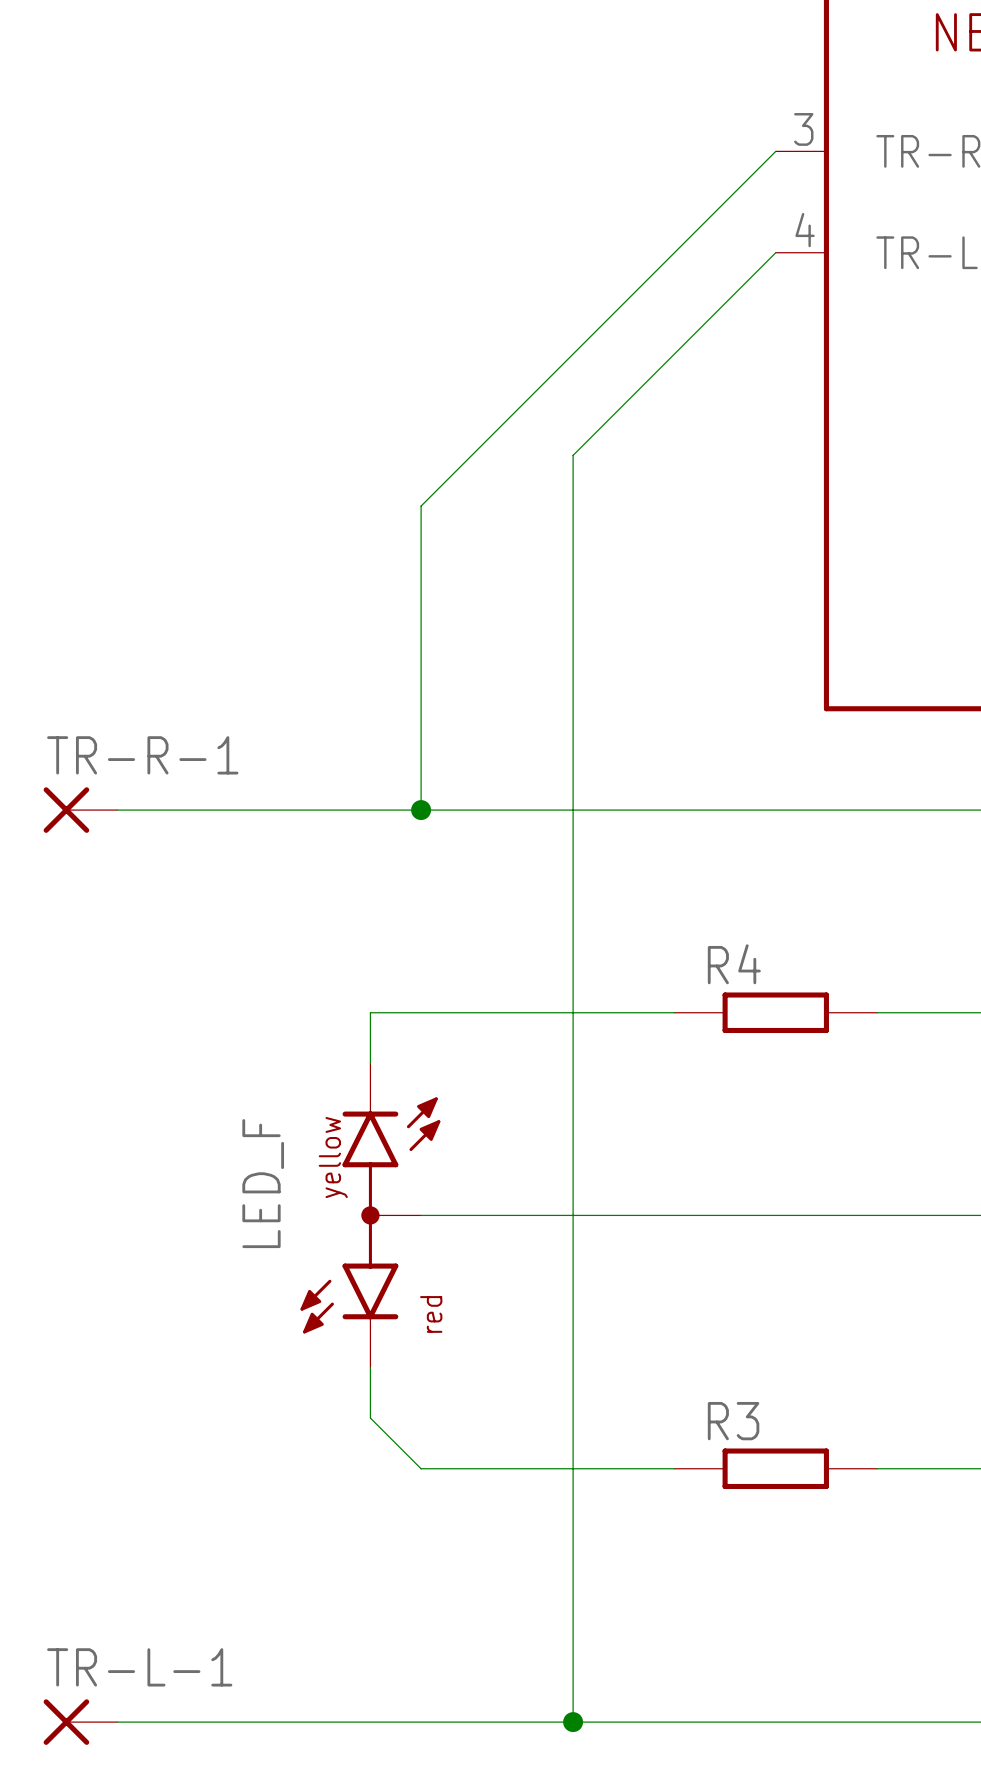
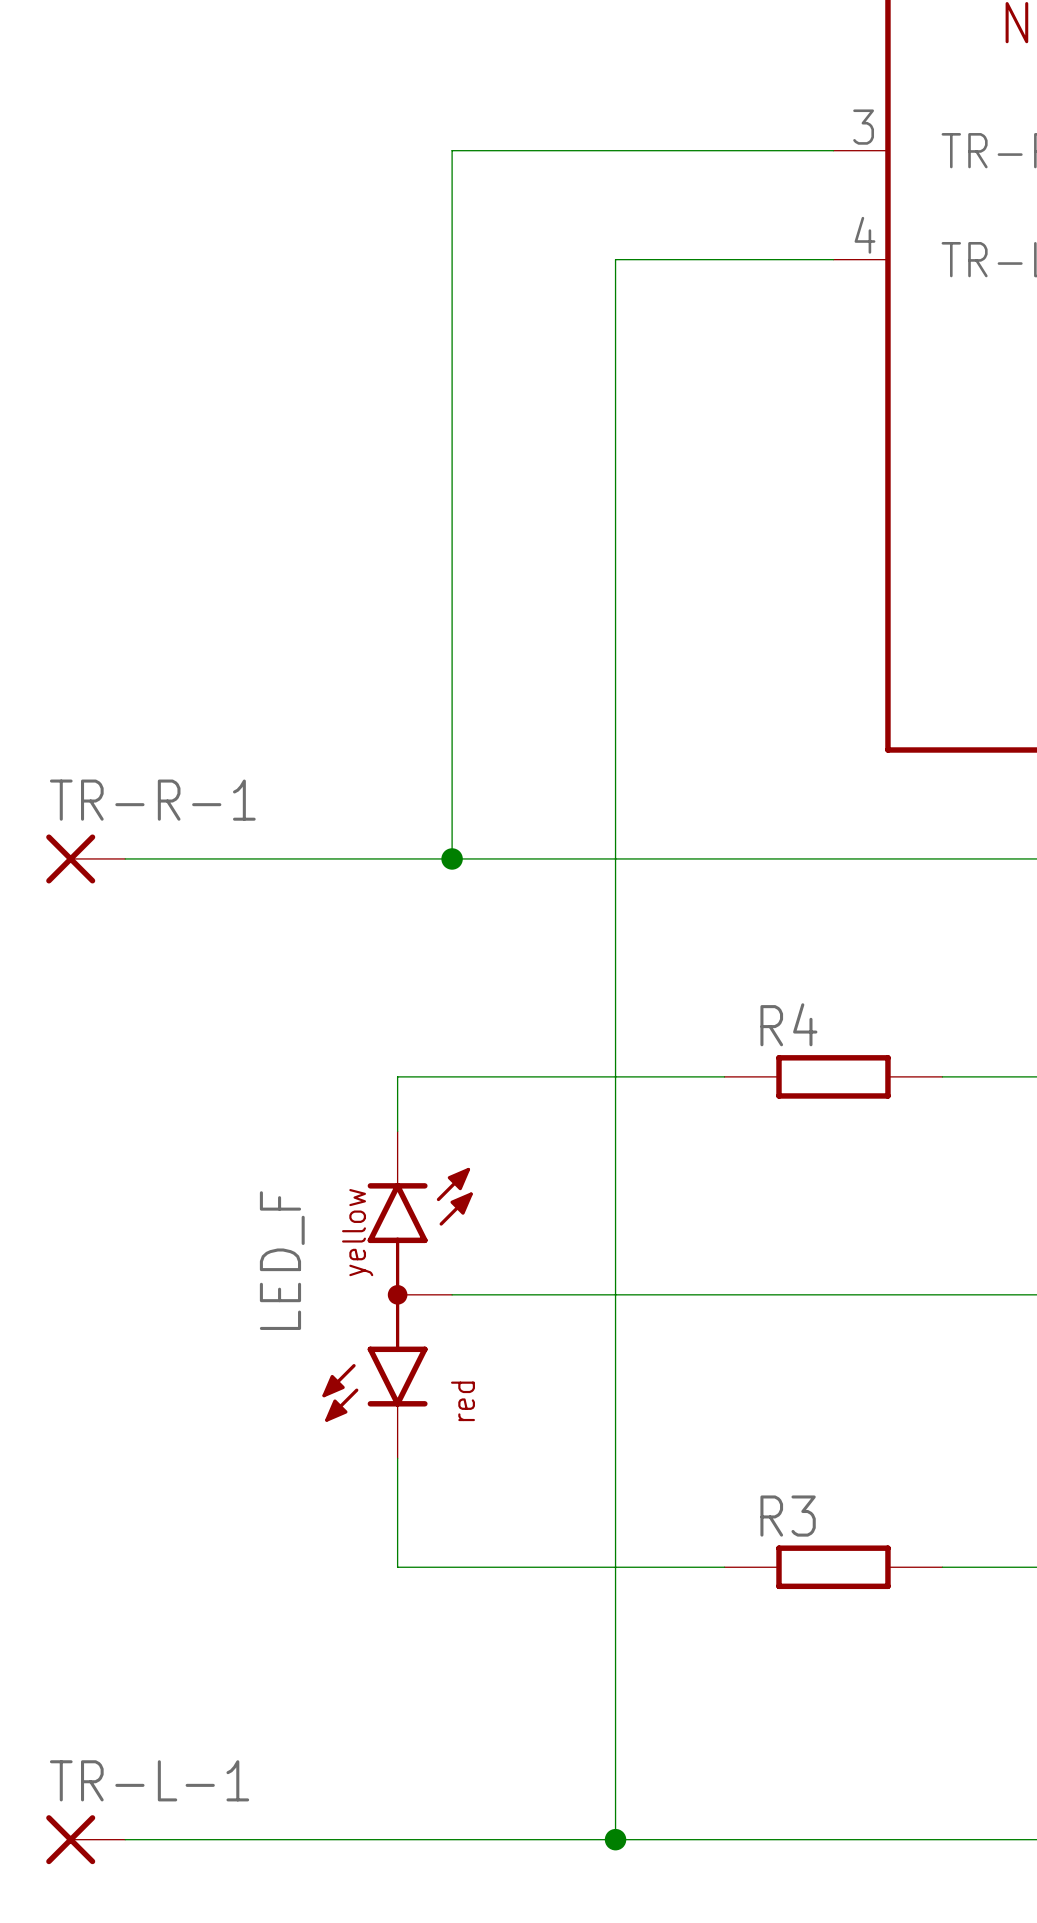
wire: (775, 151) (421, 506) -> (833, 150) (452, 150) (452, 532)
wire: (775, 252) (573, 455) -> (833, 259) (615, 259) (615, 477)
wire: (370, 1418) (421, 1468) -> (397, 1512) (397, 1567) (452, 1567)

